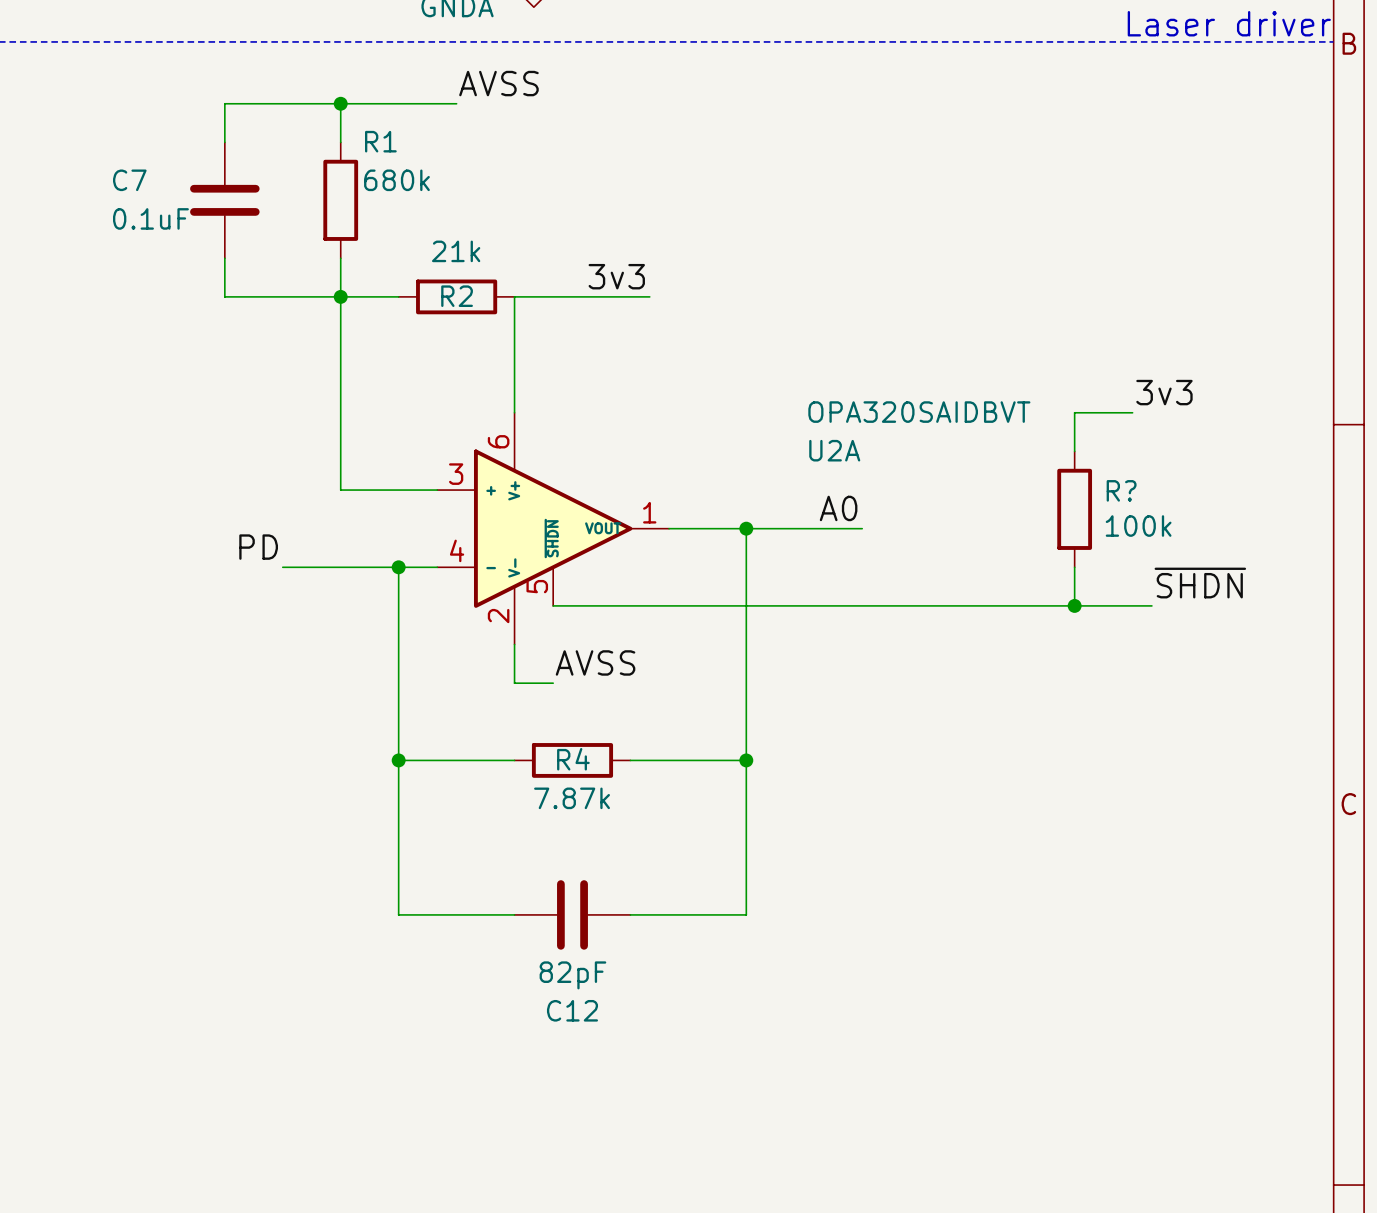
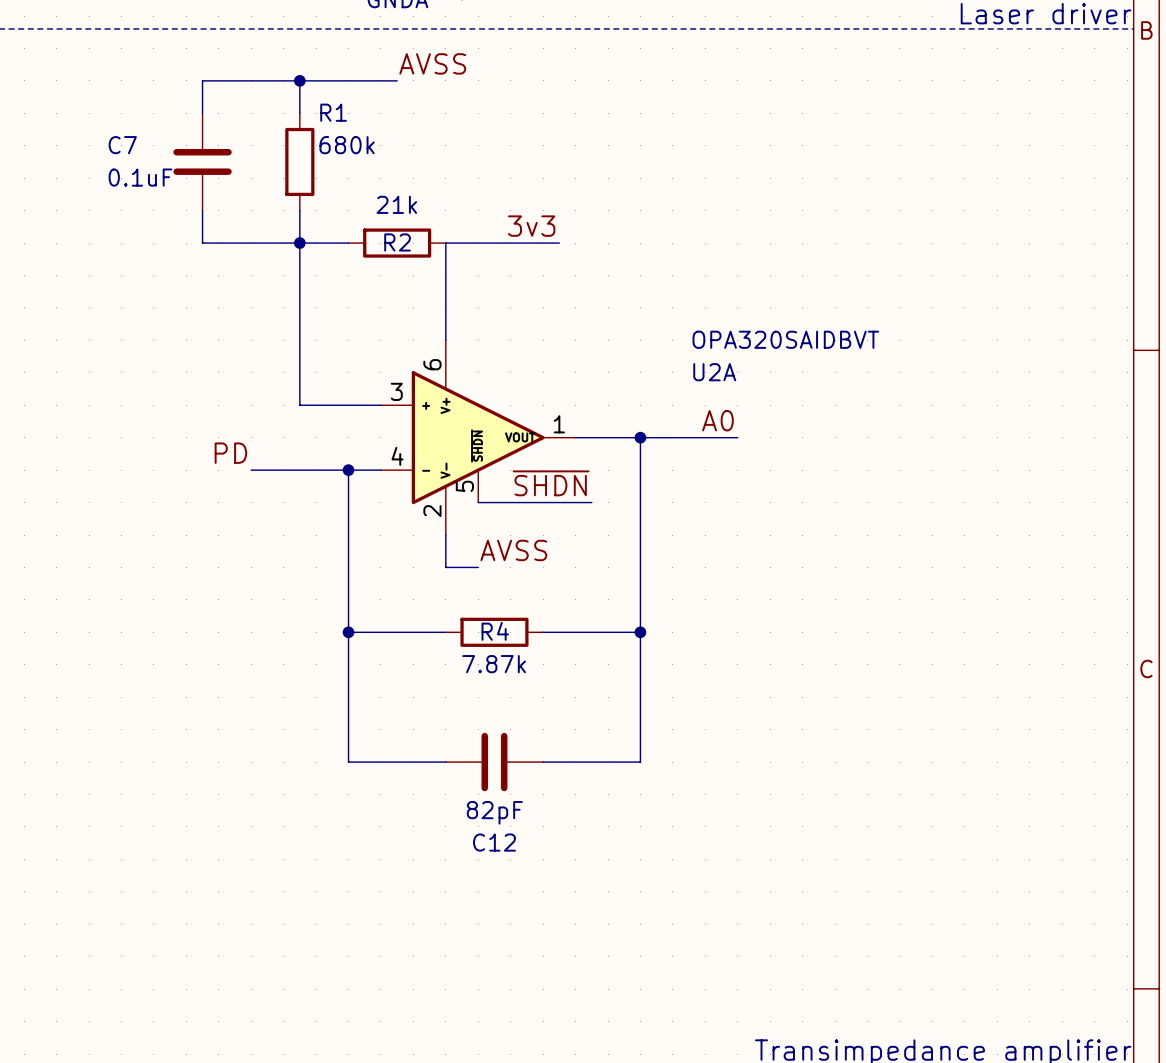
label: 3v3 (1164, 392) -> none
wire: (1132, 412) (1074, 412) (1074, 451) -> none
R?: 100k (1074, 509) -> none
wire: (1074, 567) (1074, 605) -> none
label: none -> ~{SHDN} (551, 483)
label: ~{SHDN} (1200, 583) -> none
wire: (688, 605) (1151, 605) -> none
junction: (1074, 605) -> none

